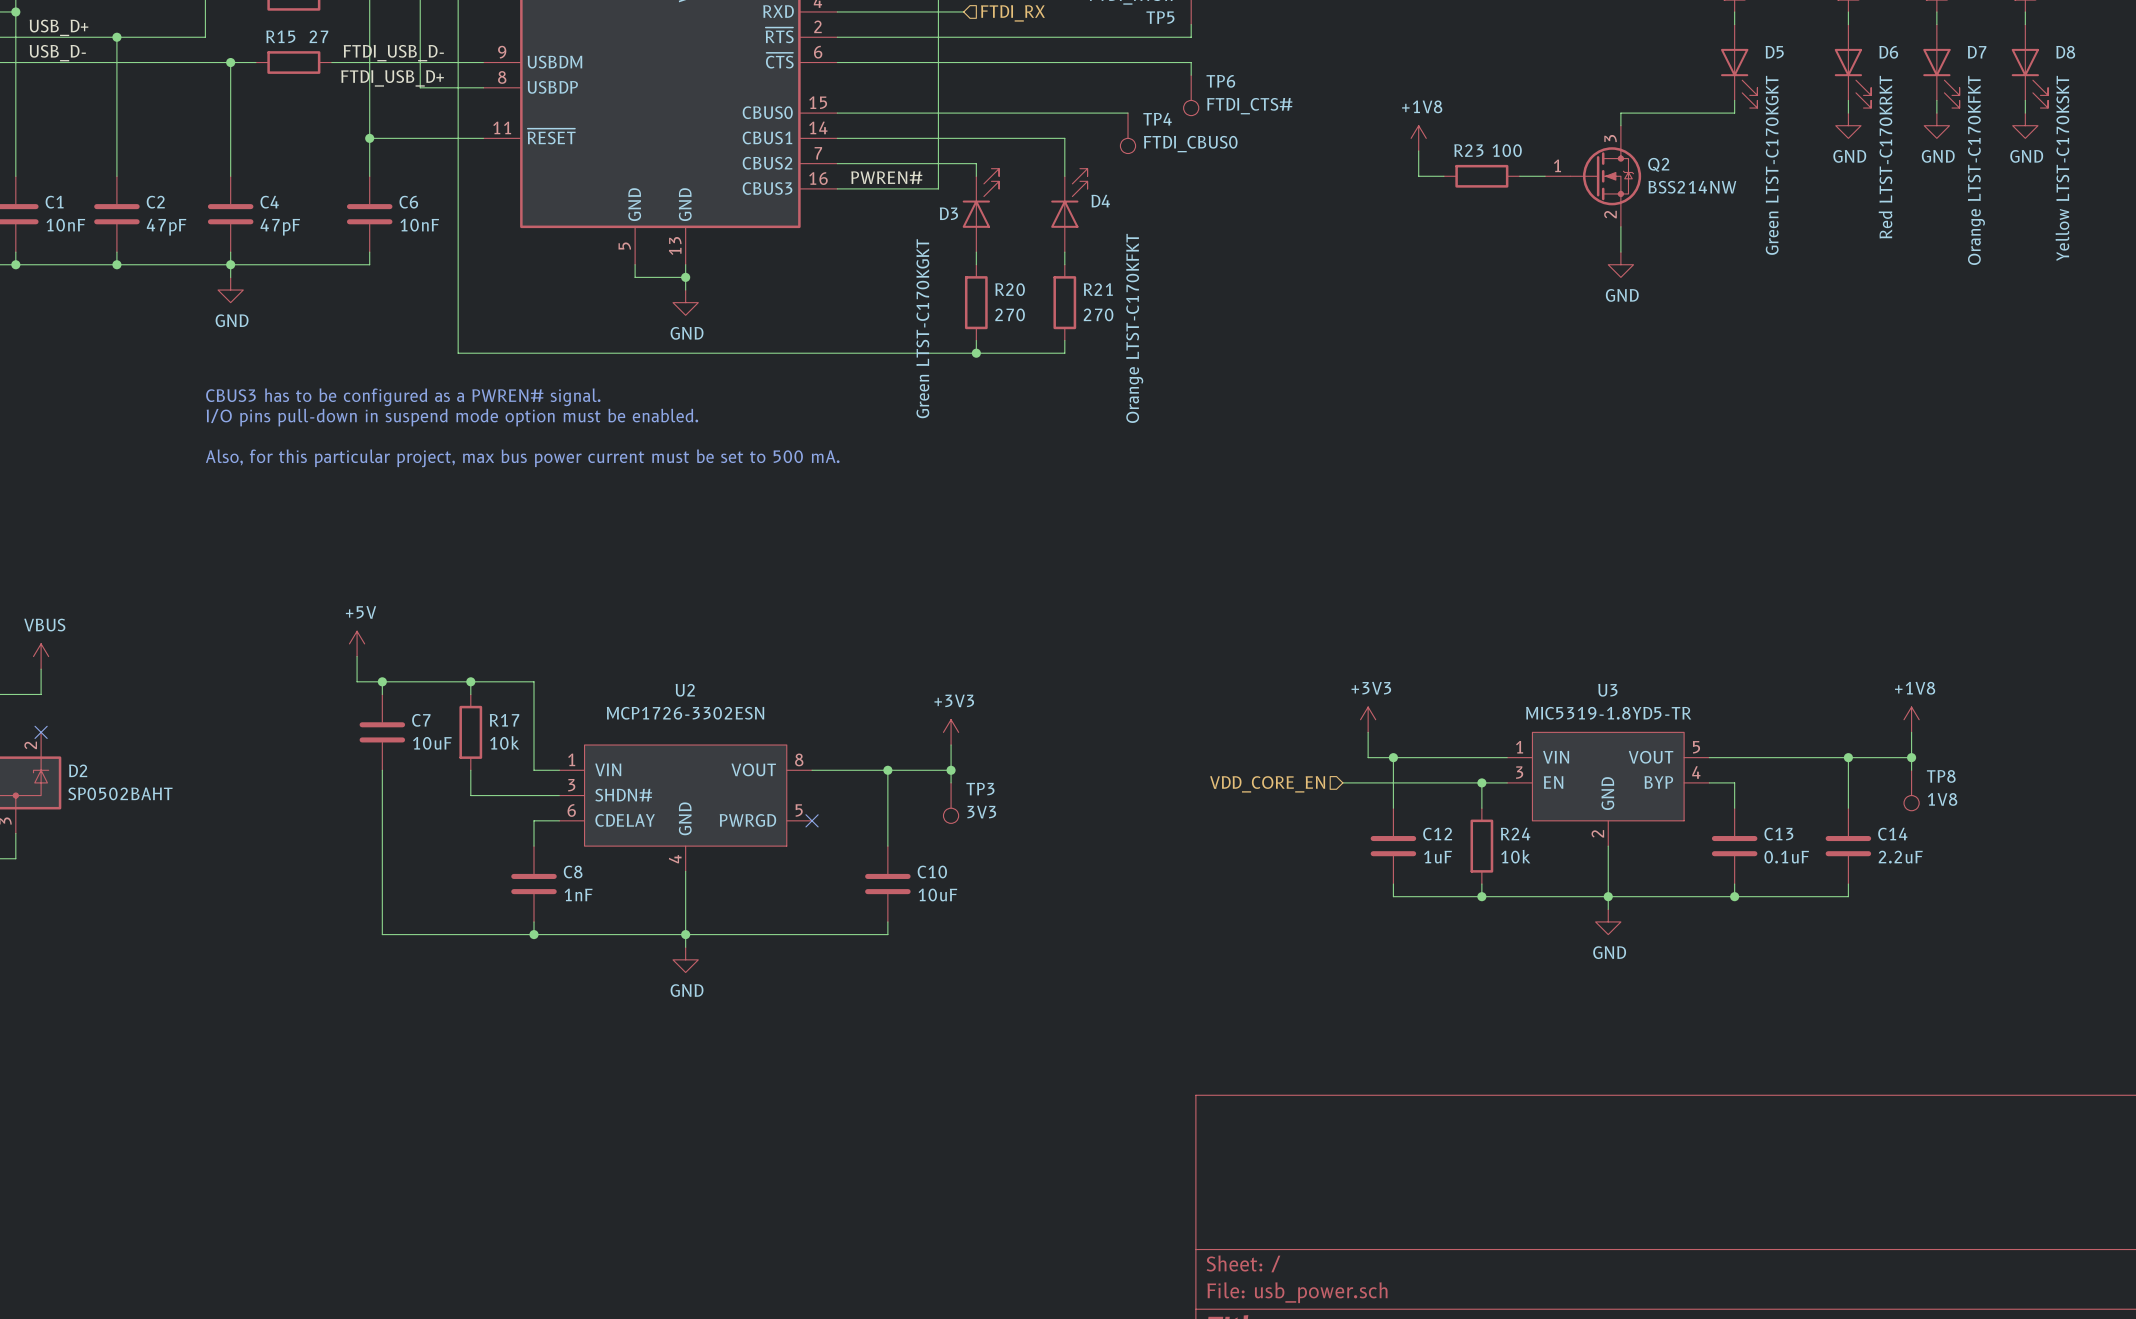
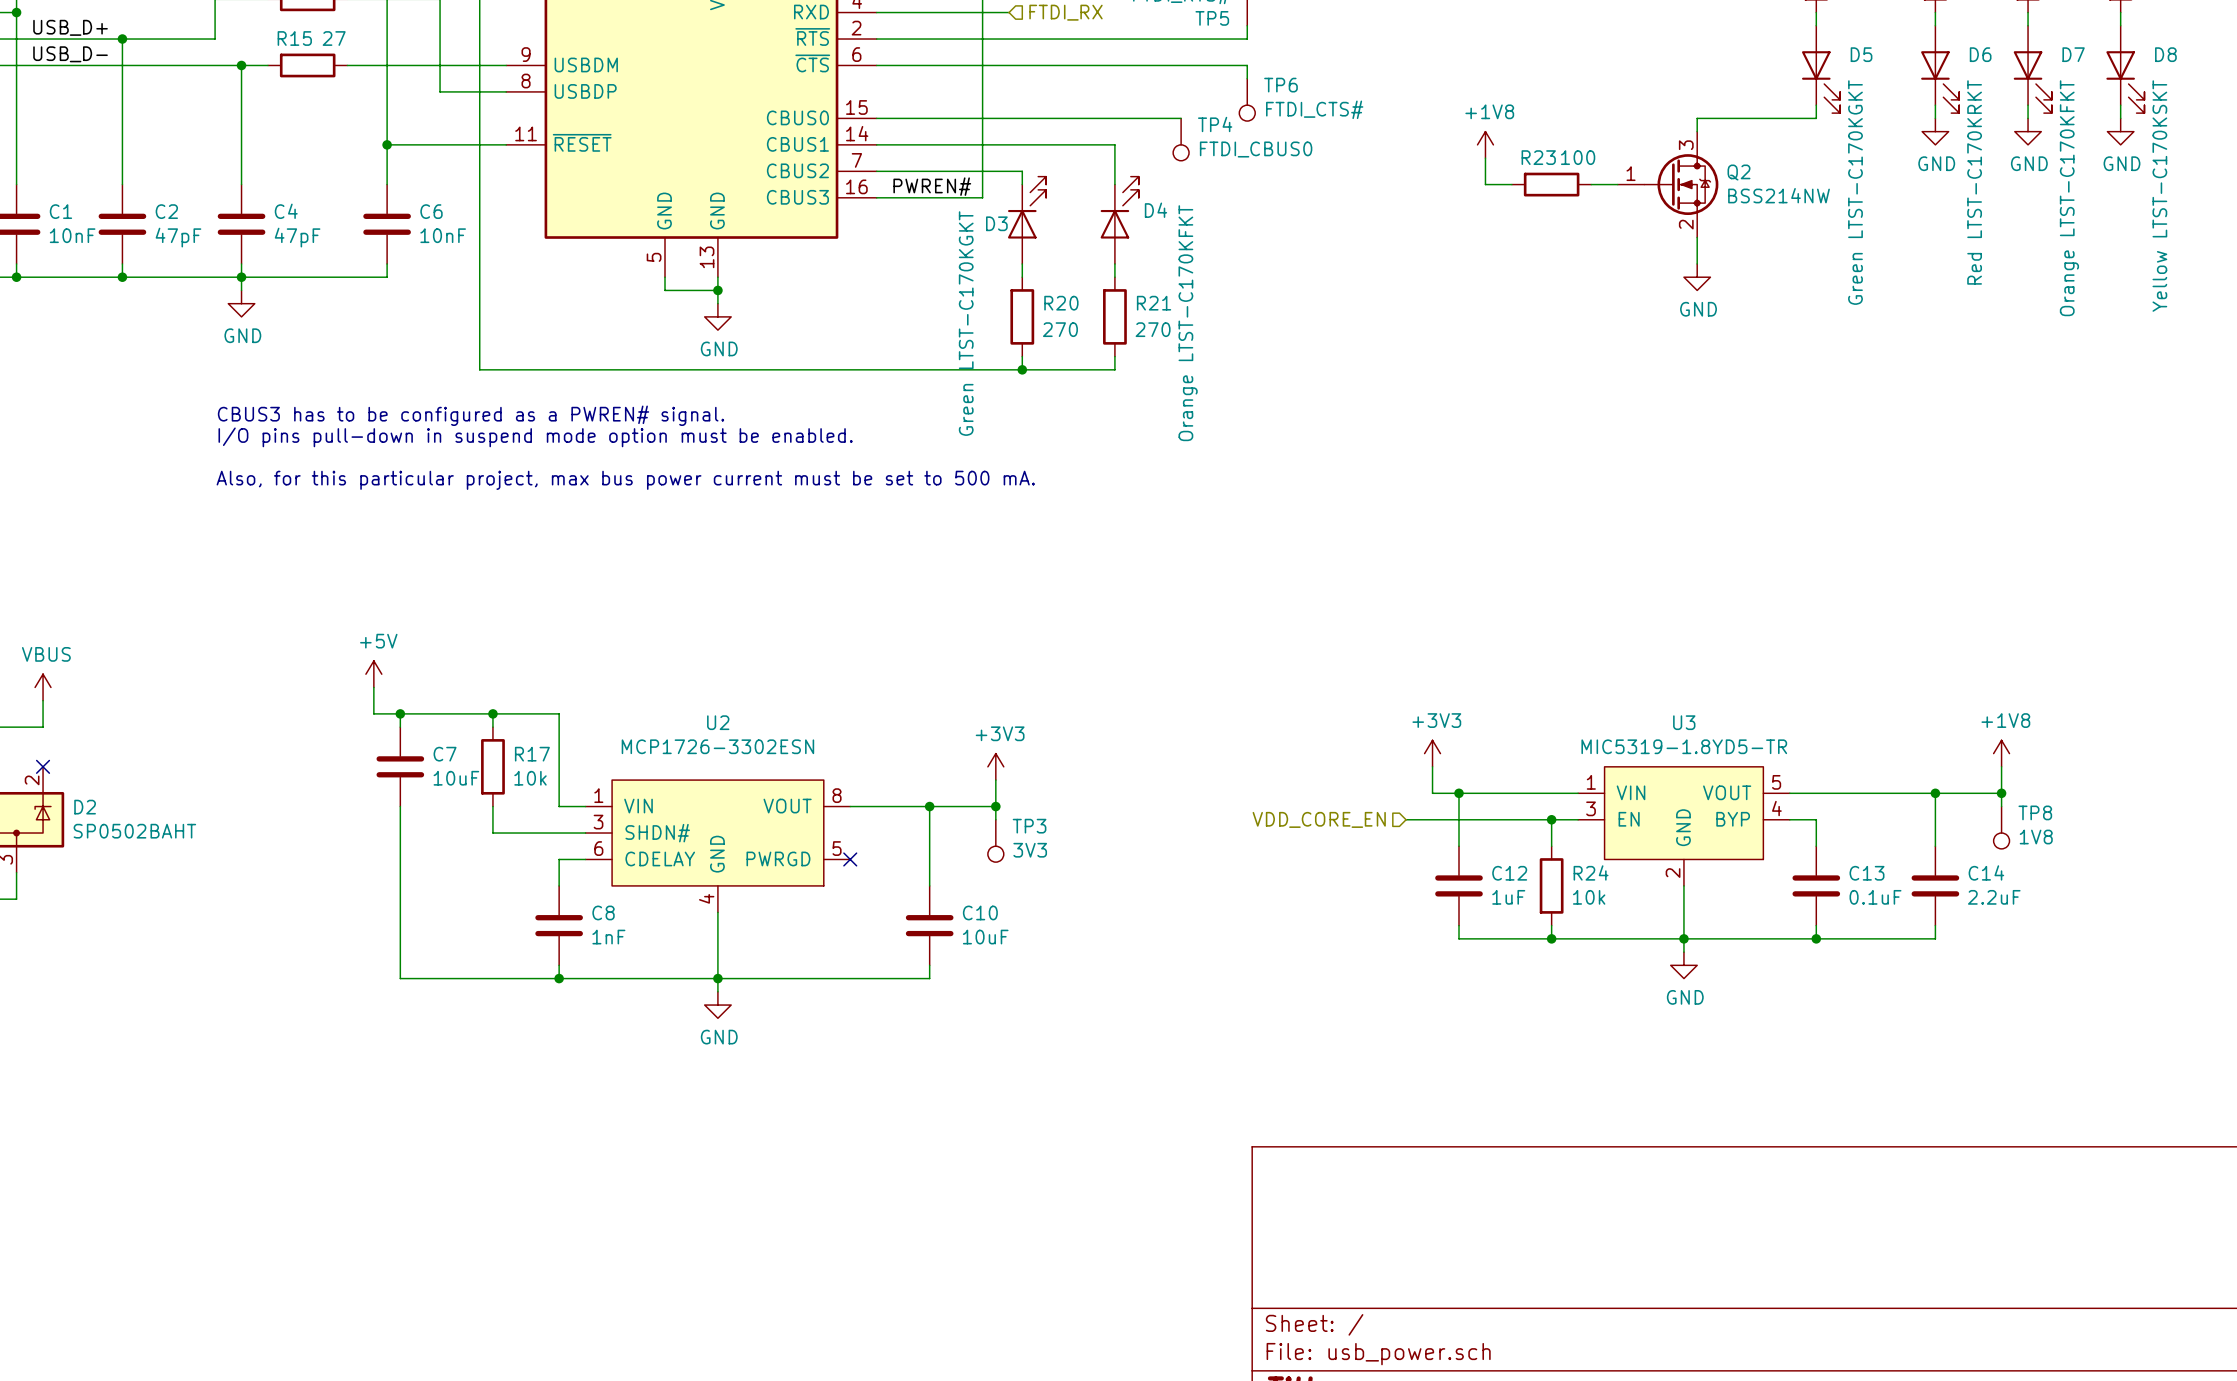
label: FTDI_USB_D- (393, 53) -> none
label: FTDI_USB_D+ (392, 78) -> none

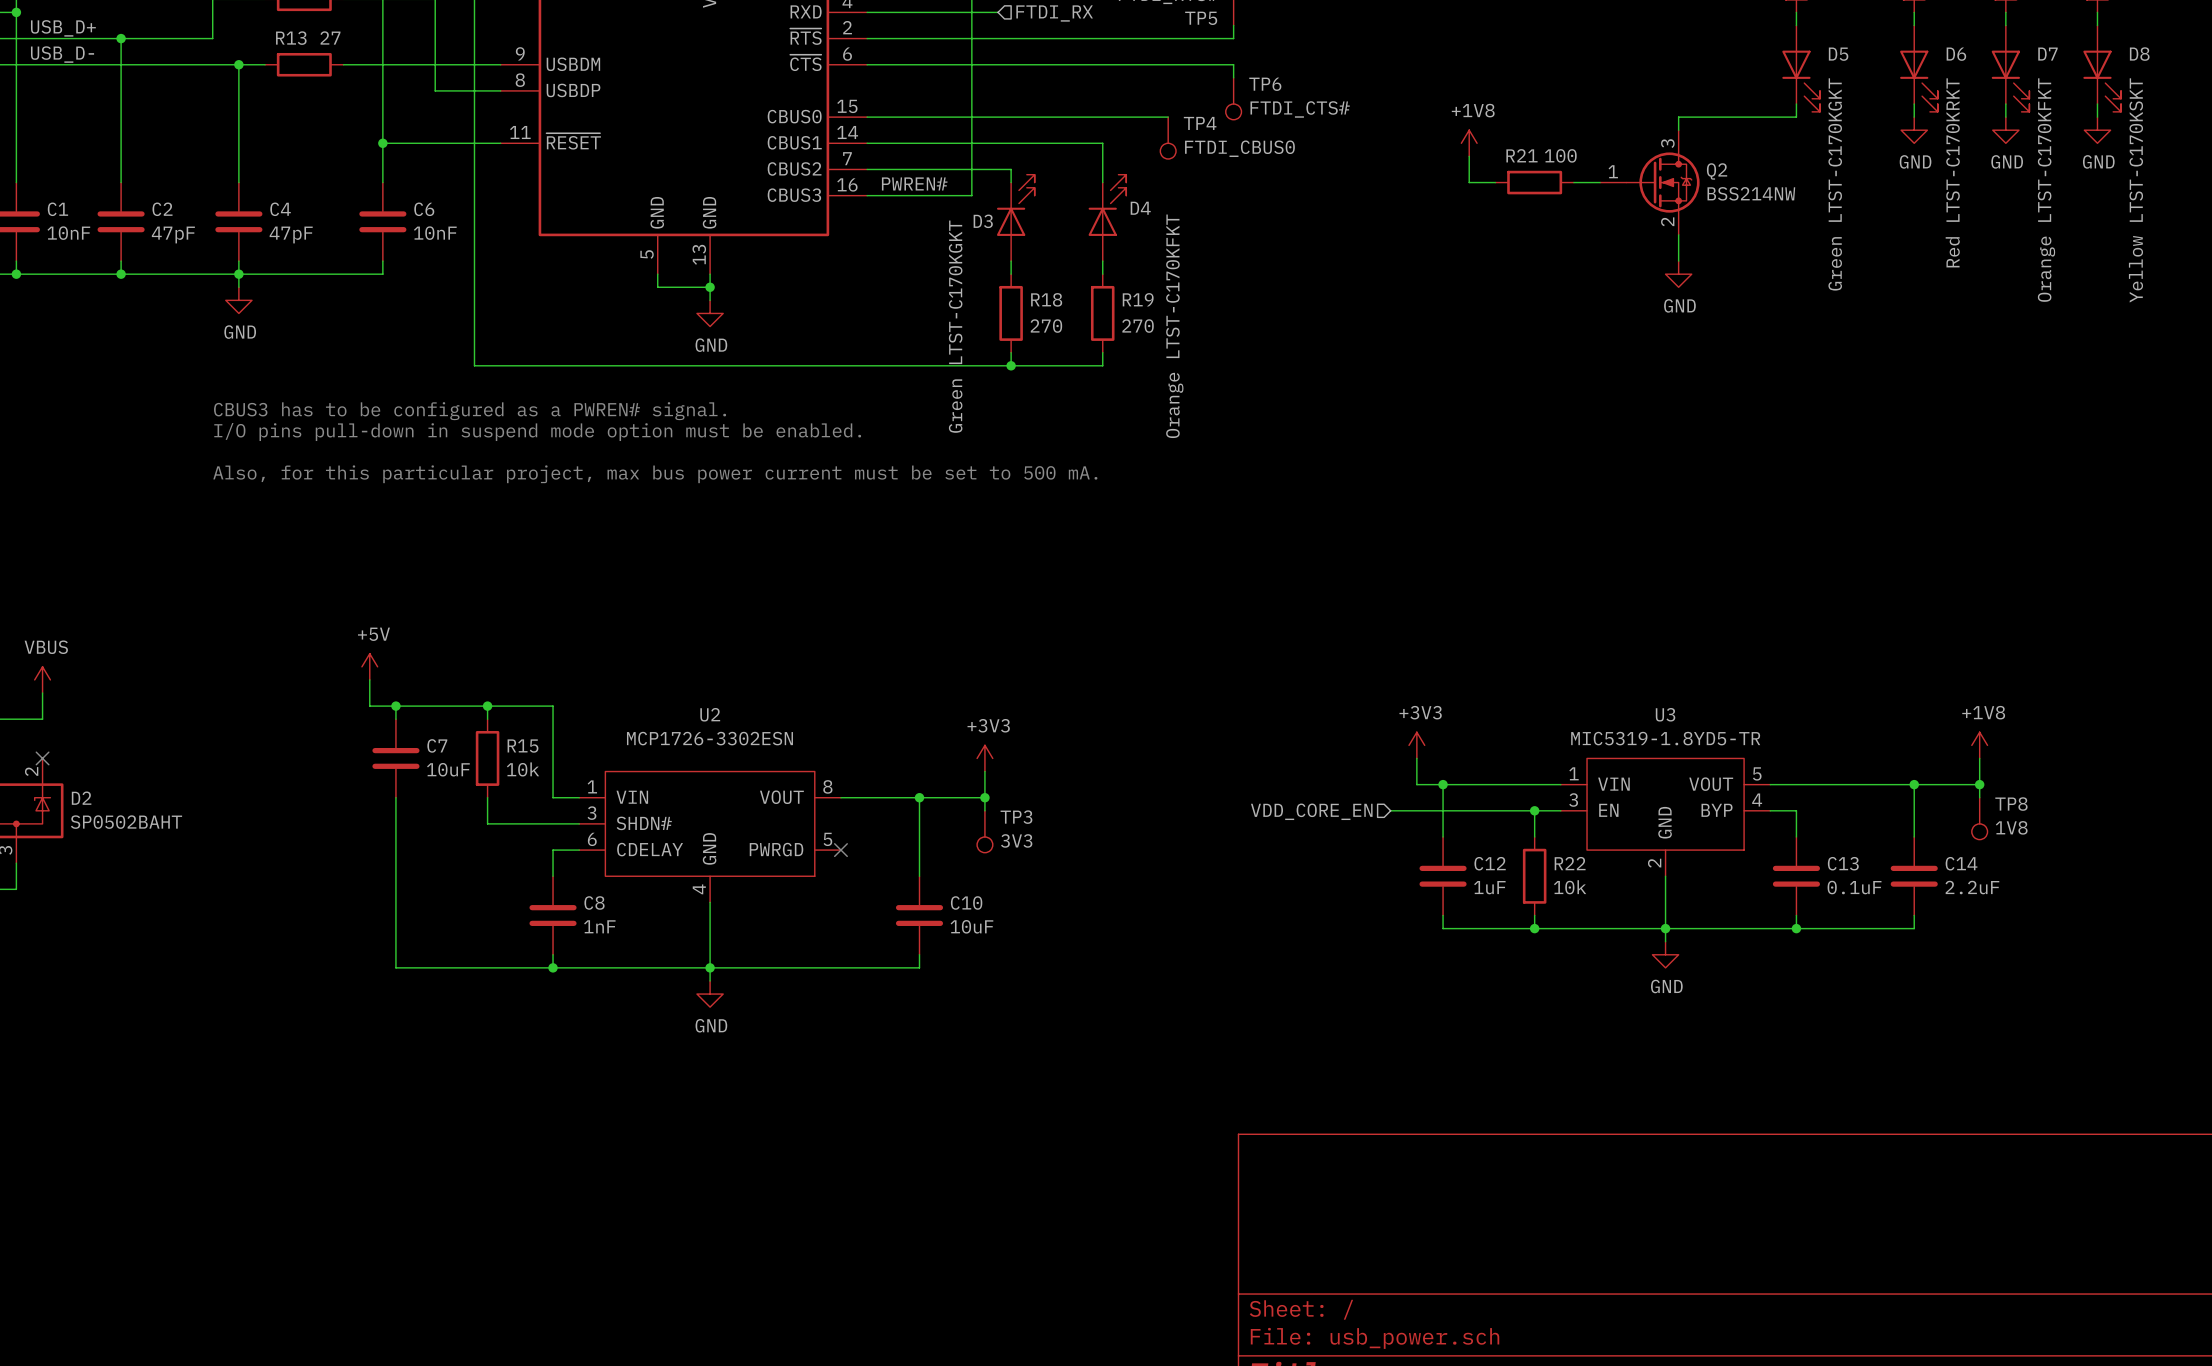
R15 name: R15 (294, 38) -> R13 (291, 38)
R23 name: R23 (1538, 157) -> R21 (1521, 155)
R20 name: R20 (1061, 303) -> R18 (1046, 299)
R21 name: R21 (1154, 303) -> R19 (1138, 299)
R17 name: R17 (532, 754) -> R15 (522, 746)
R24 name: R24 (1591, 872) -> R22 (1570, 863)

